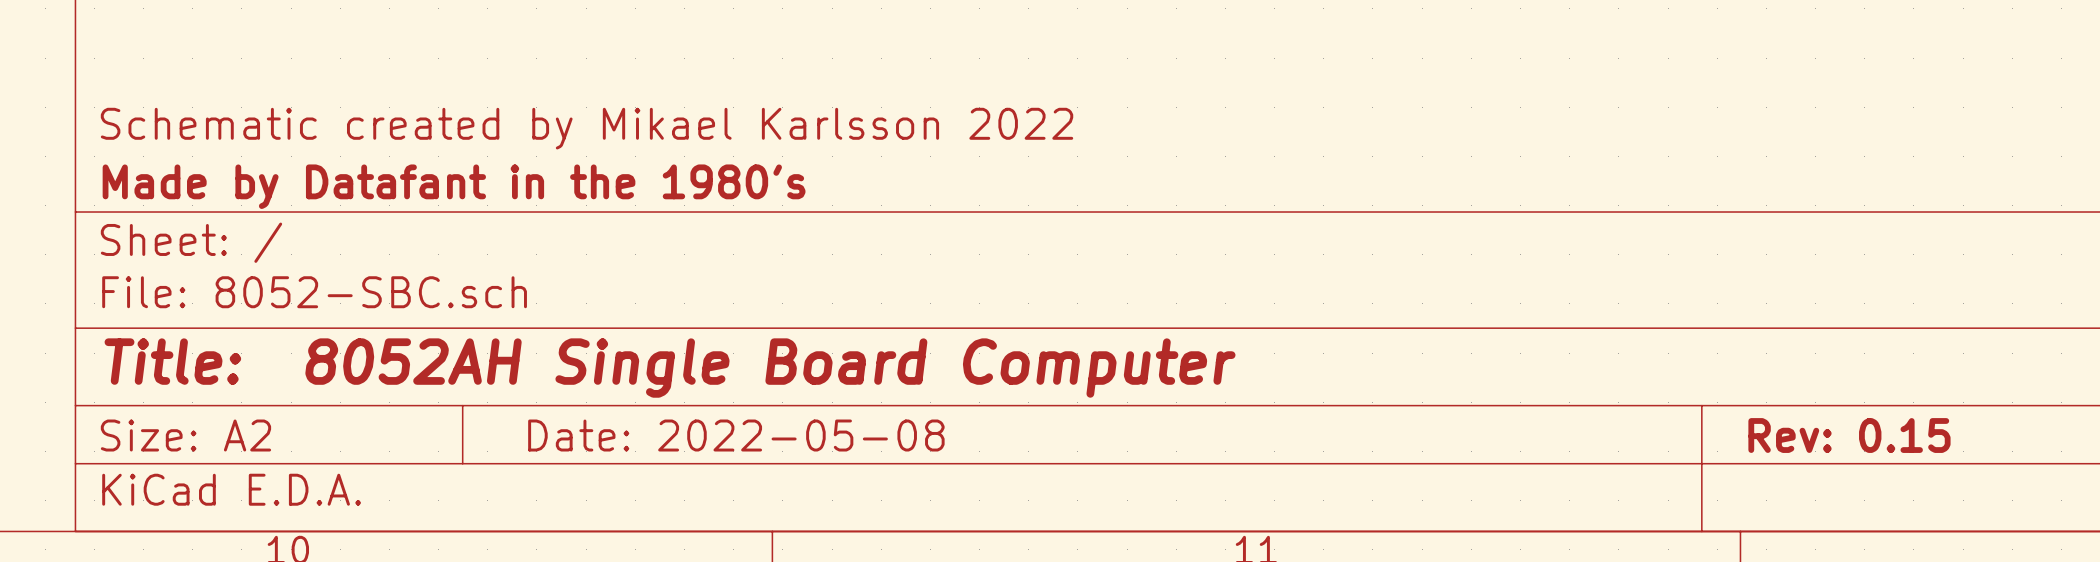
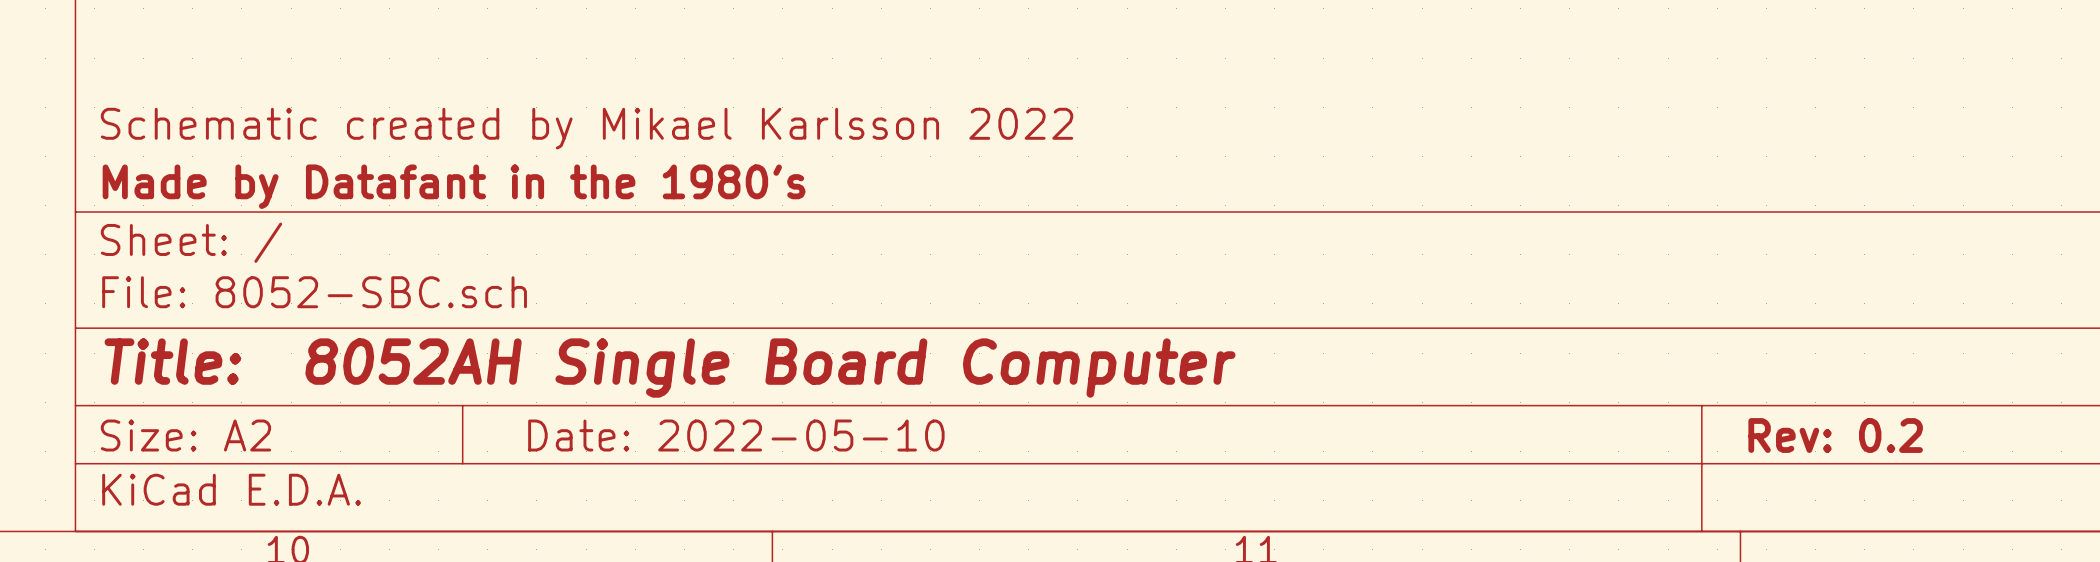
title block: Date: 2022-05-08 (736, 435) -> Date: 2022-05-10 (736, 435)
title block: Rev: 0.15 (1849, 435) -> Rev: 0.2 (1835, 435)

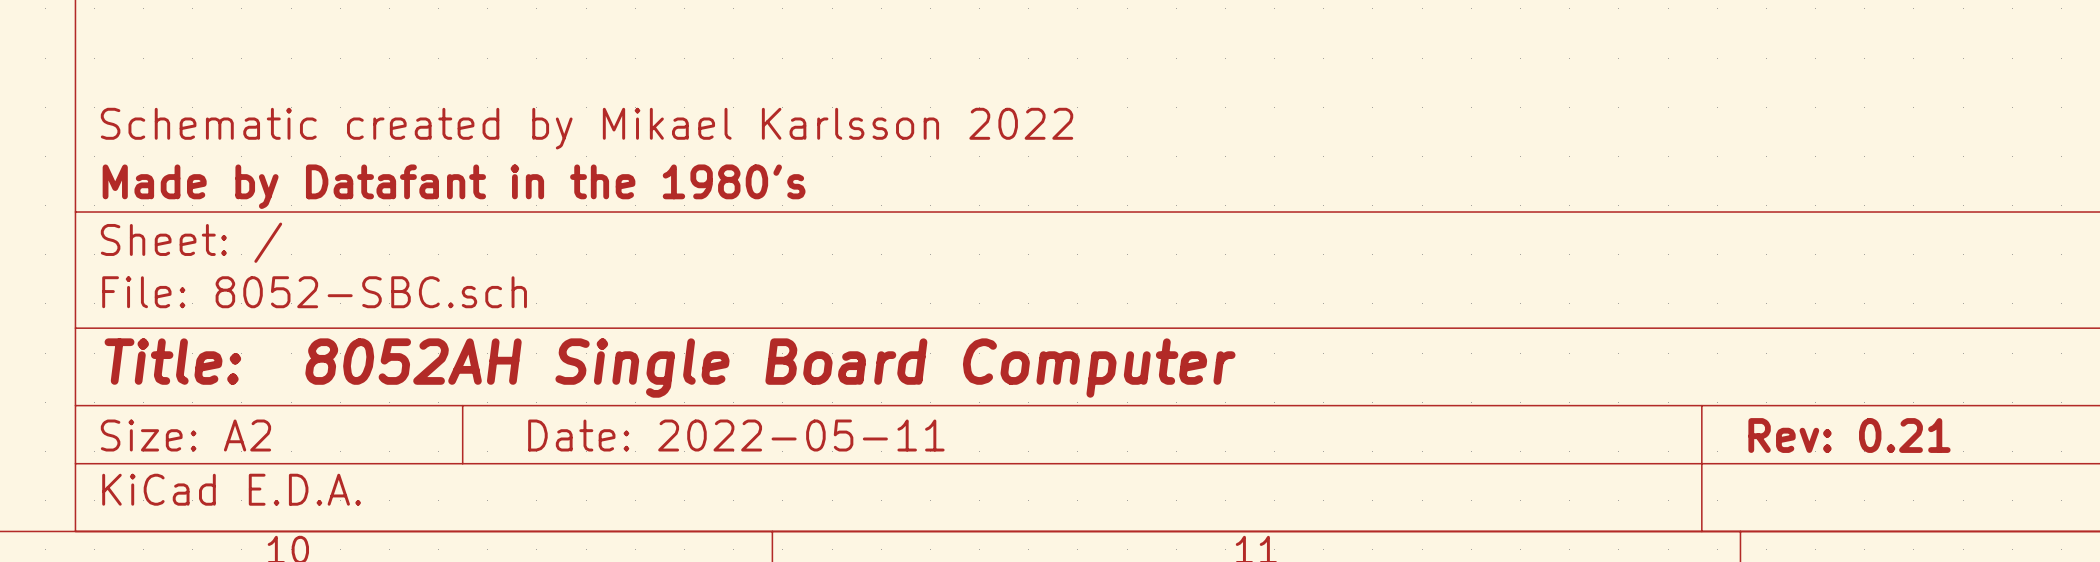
title block: Date: 2022-05-10 (736, 435) -> Date: 2022-05-11 (736, 435)
title block: Rev: 0.2 (1835, 435) -> Rev: 0.21 (1849, 435)

